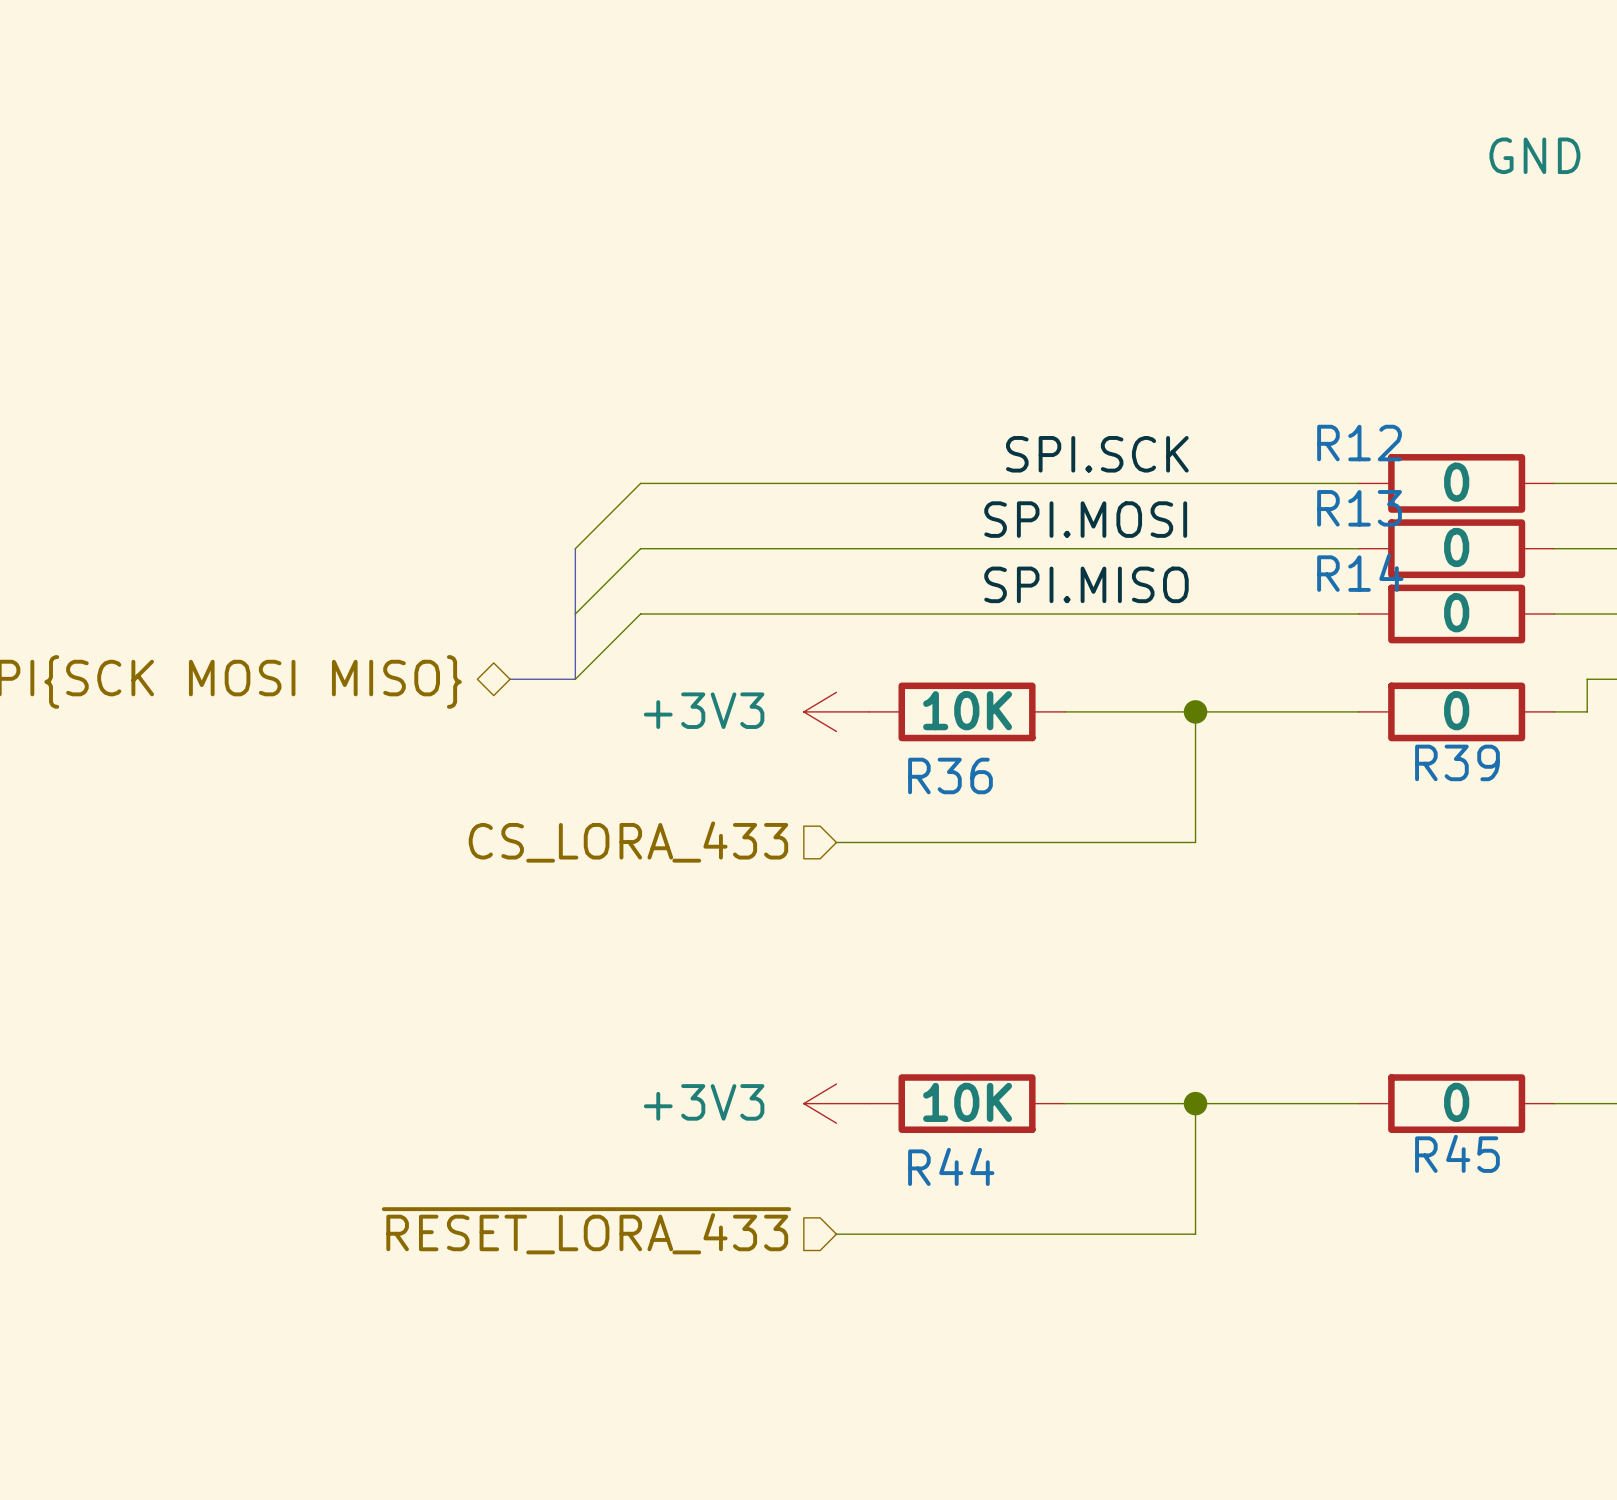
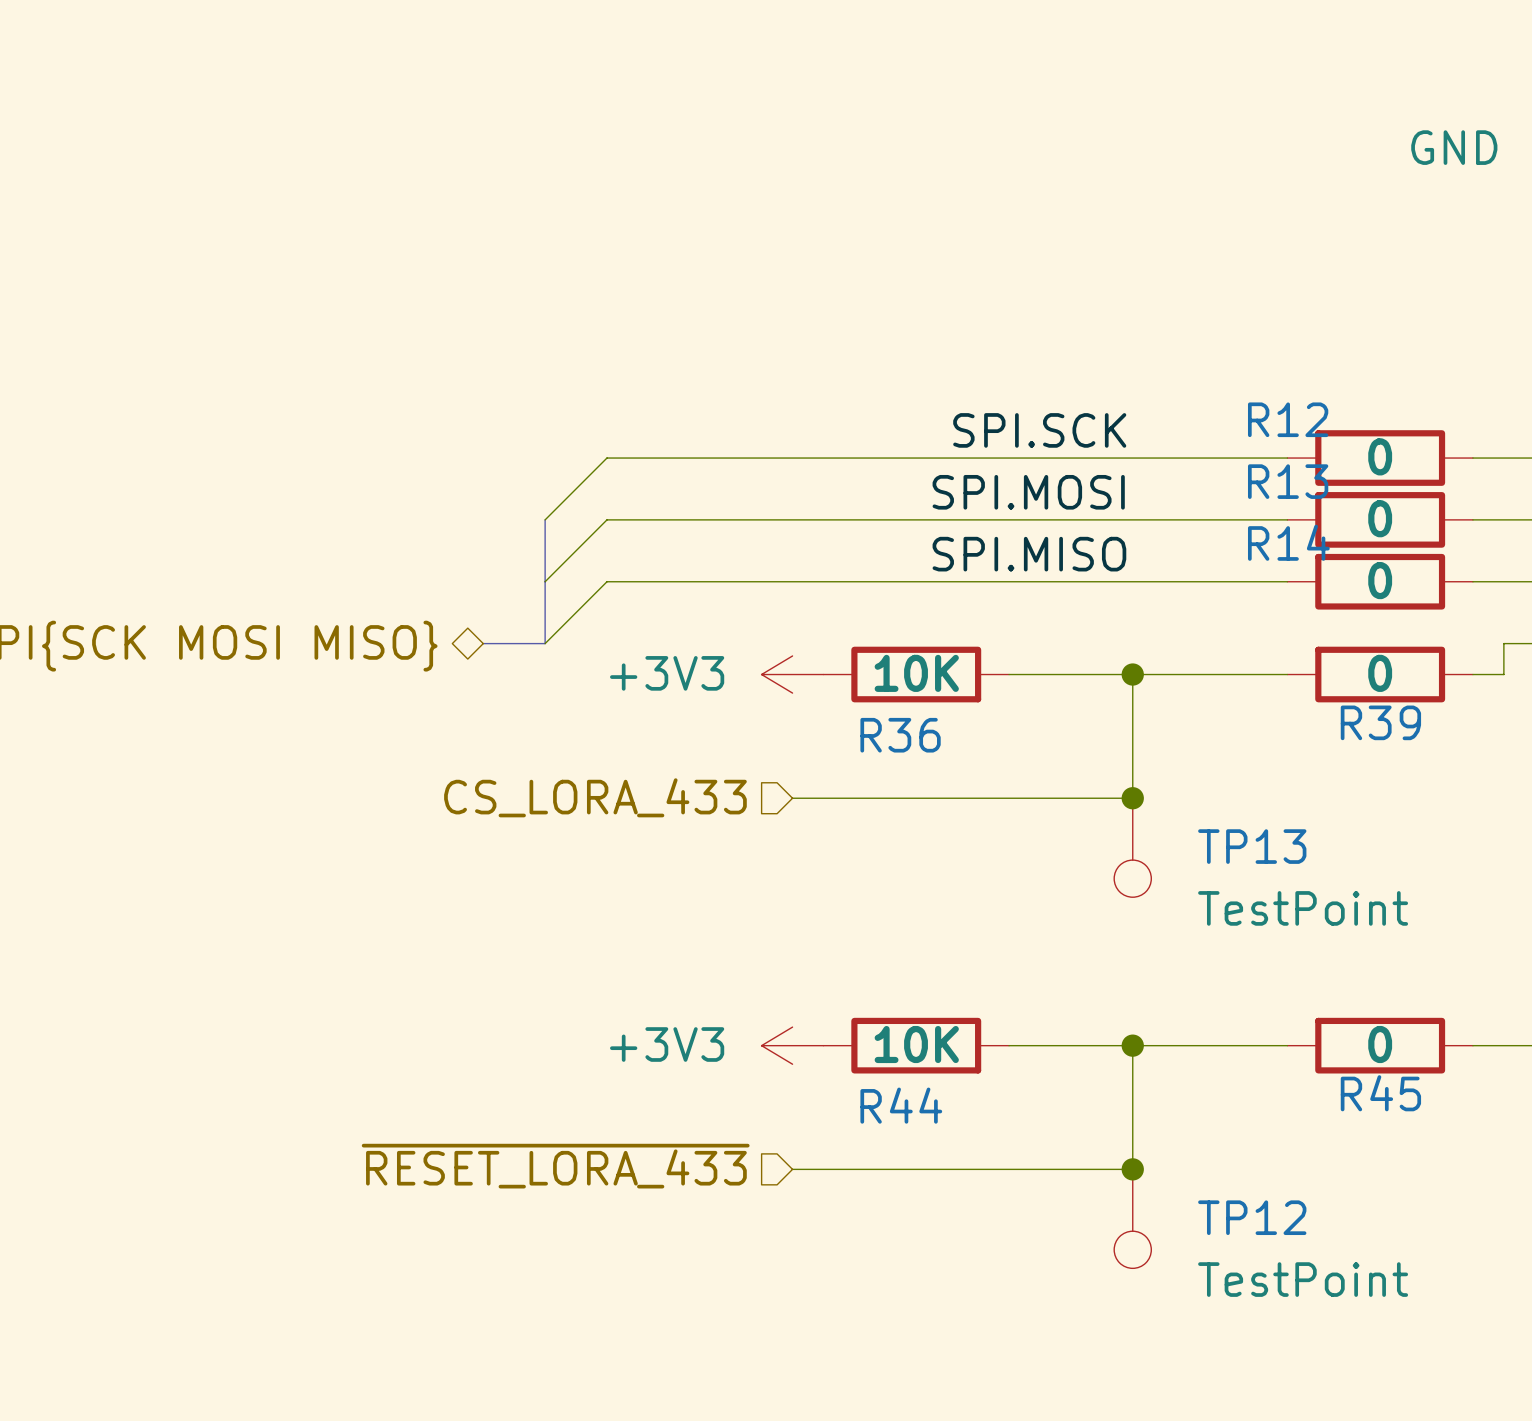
junction: none -> (1132, 798)
TP13: none -> TestPoint (1132, 847)
junction: none -> (1132, 1169)
TP12: none -> TestPoint (1132, 1218)

